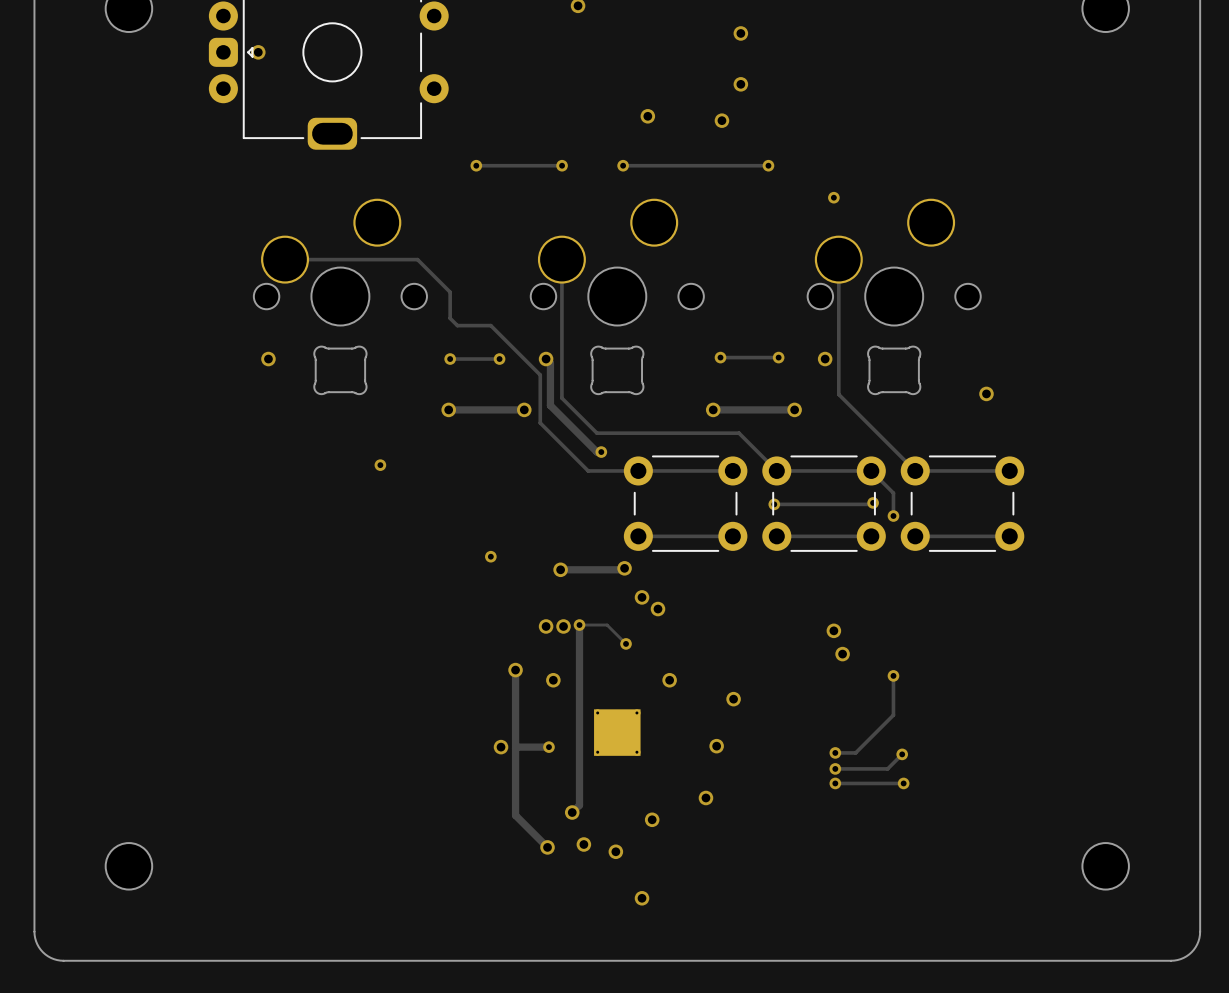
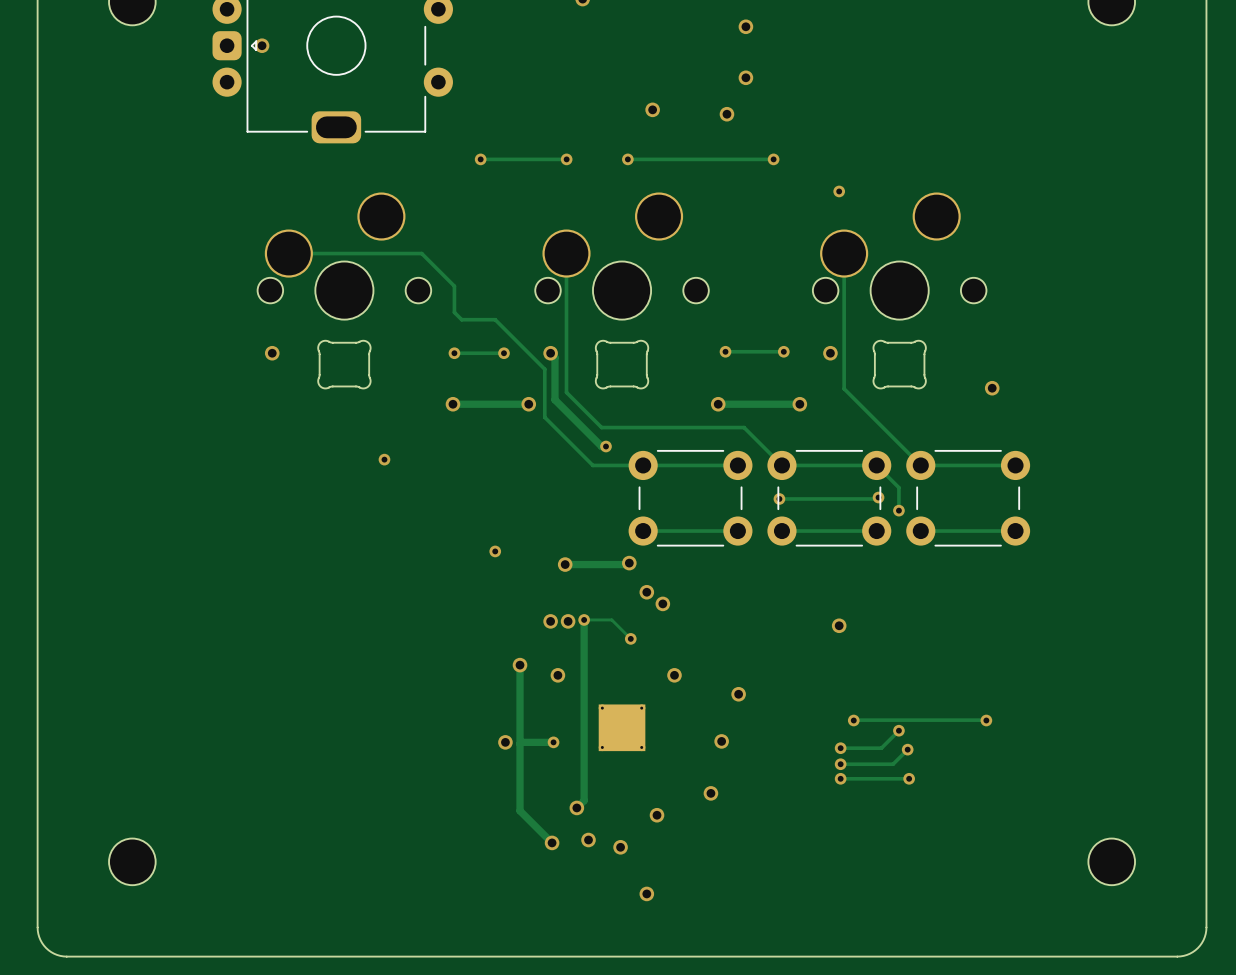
via: (842, 654) -> none
track: (893, 675) (893, 715) (855, 752) -> (898, 730) (881, 748) (861, 748)
via: (893, 675) -> none
track: none -> (853, 720) (986, 720)
via: none -> (853, 720)
via: none -> (986, 720)
via: none -> (898, 730)

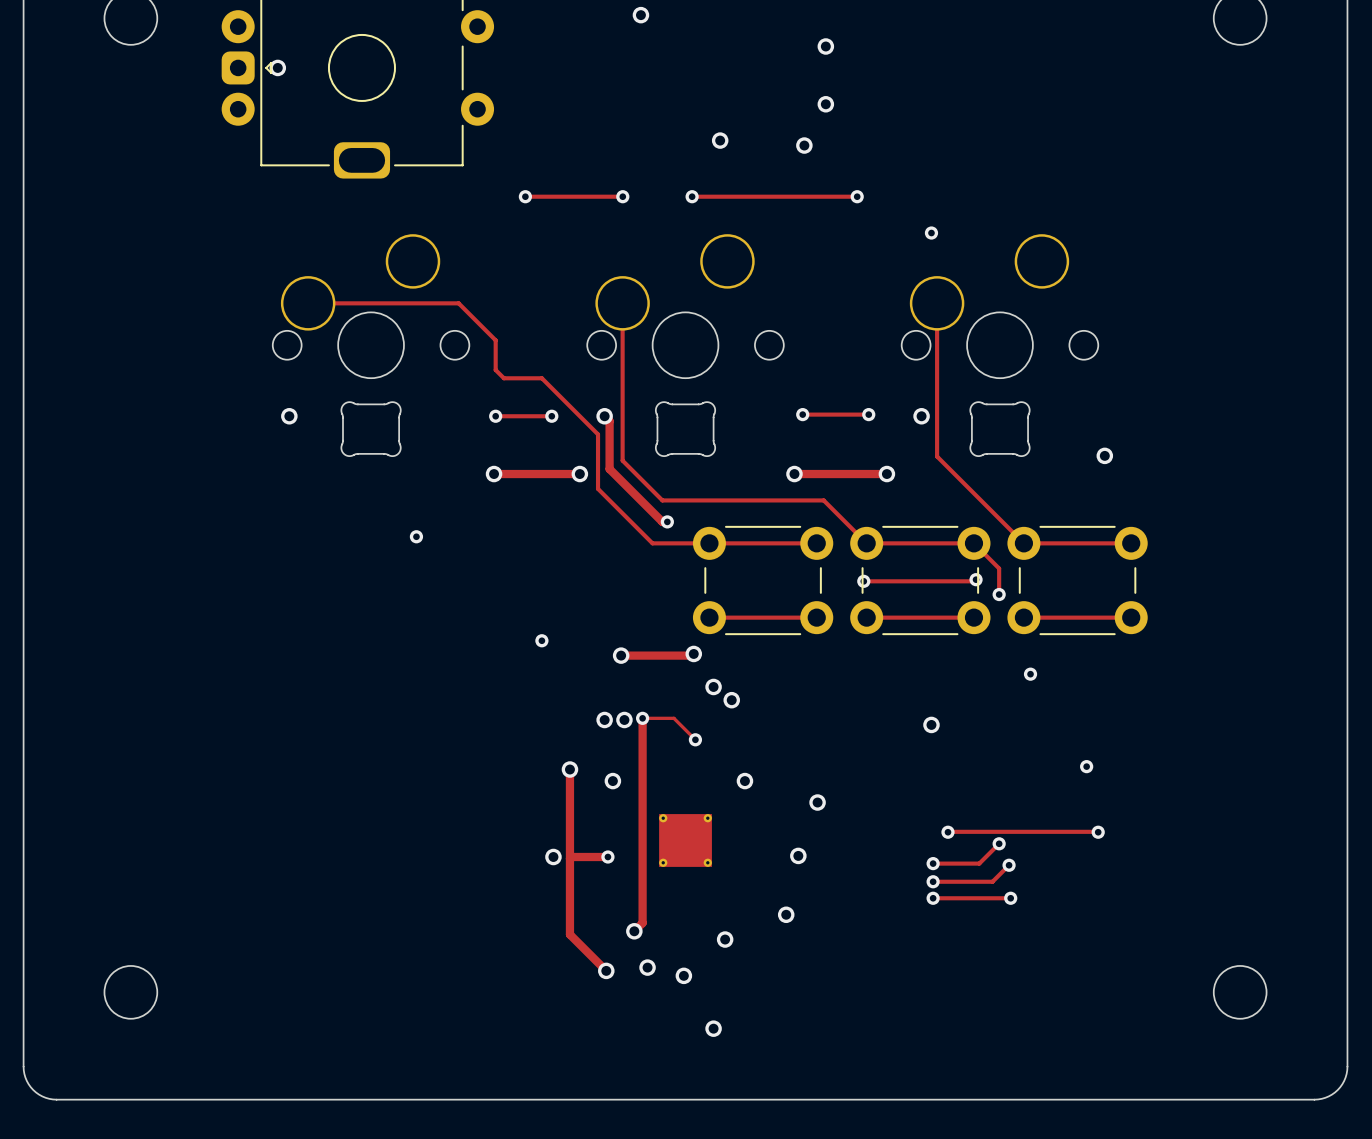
via: none -> (1030, 674)
via: none -> (1086, 766)

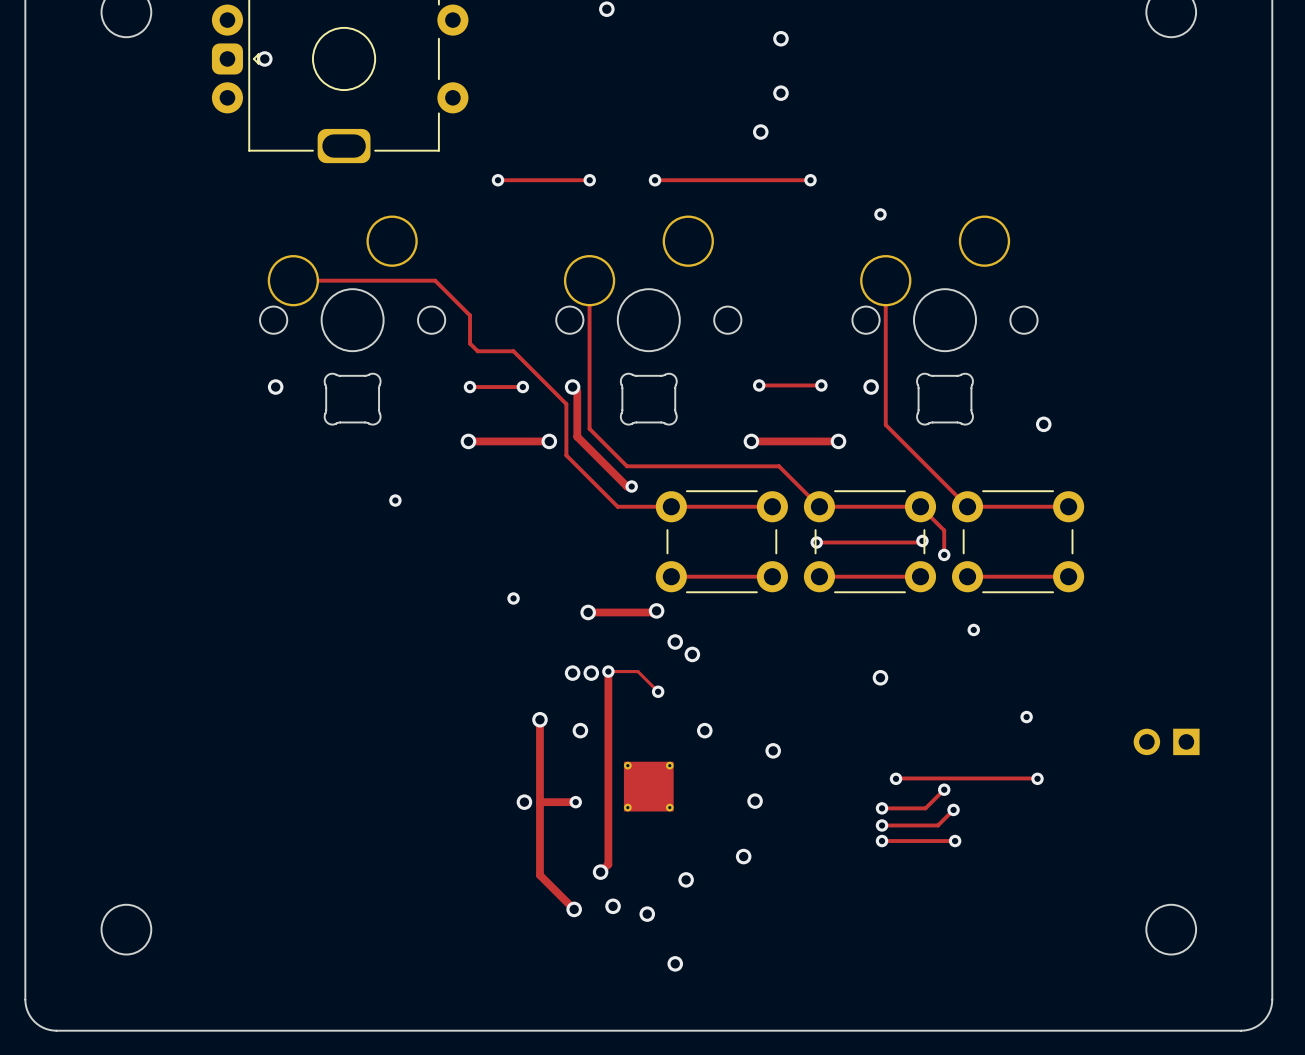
via: (720, 140) -> none
part: none -> (1166, 741)

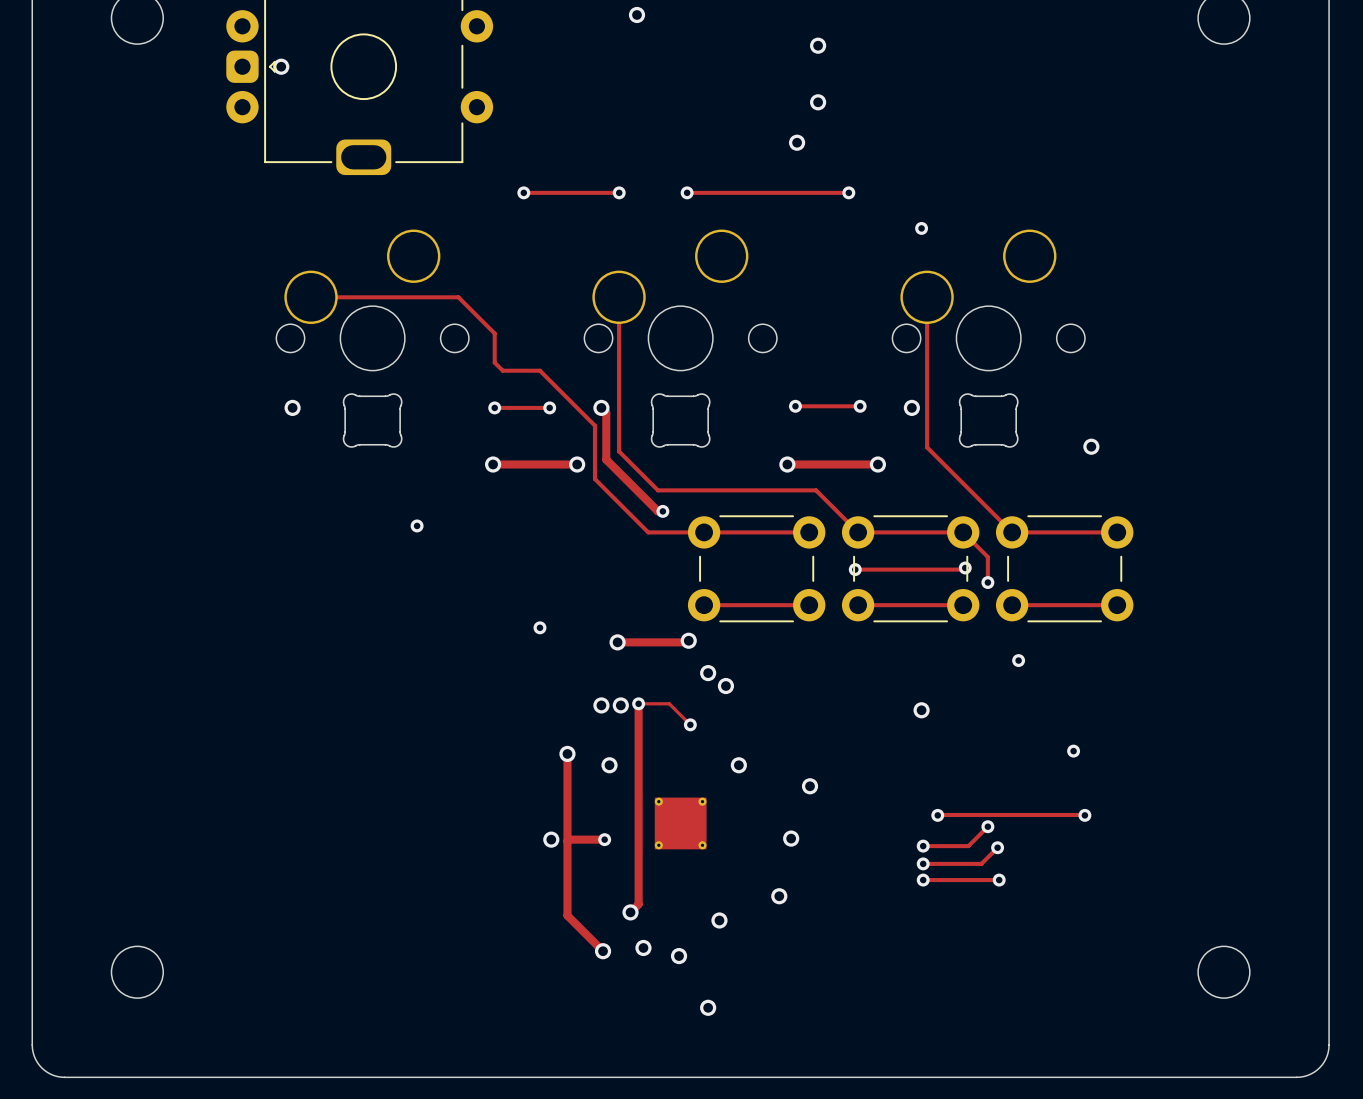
part: (1166, 741) -> none

